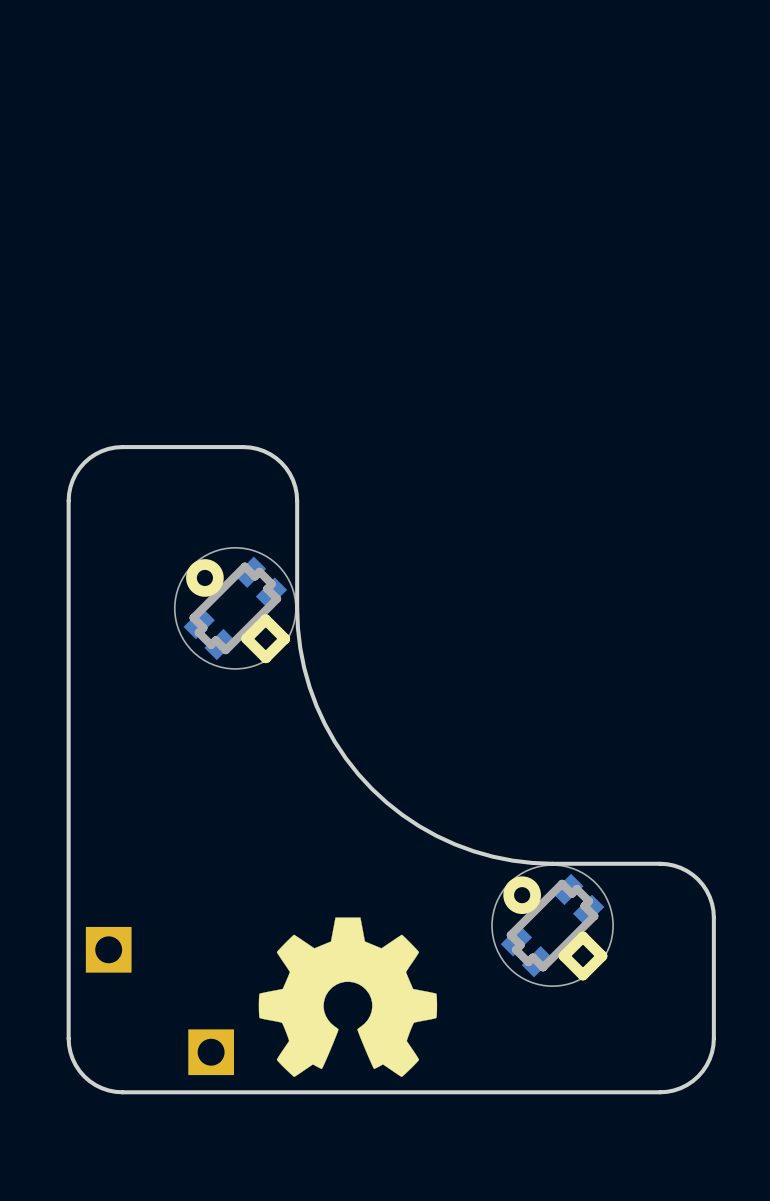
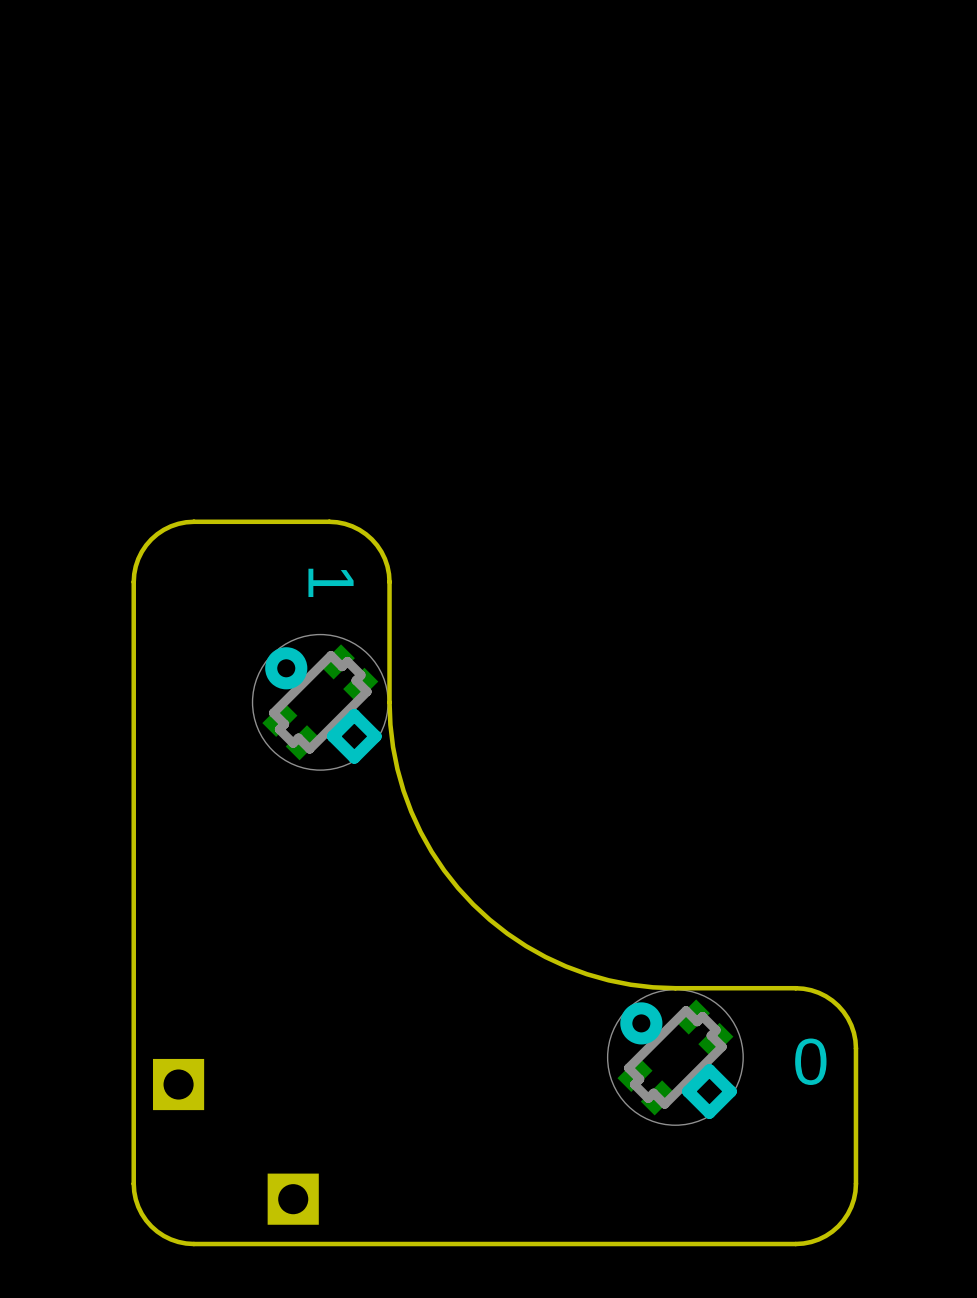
text: none -> 1 (331, 582)
drawing: [258, 917, 438, 1077] -> none
text: none -> 0 (810, 1061)

